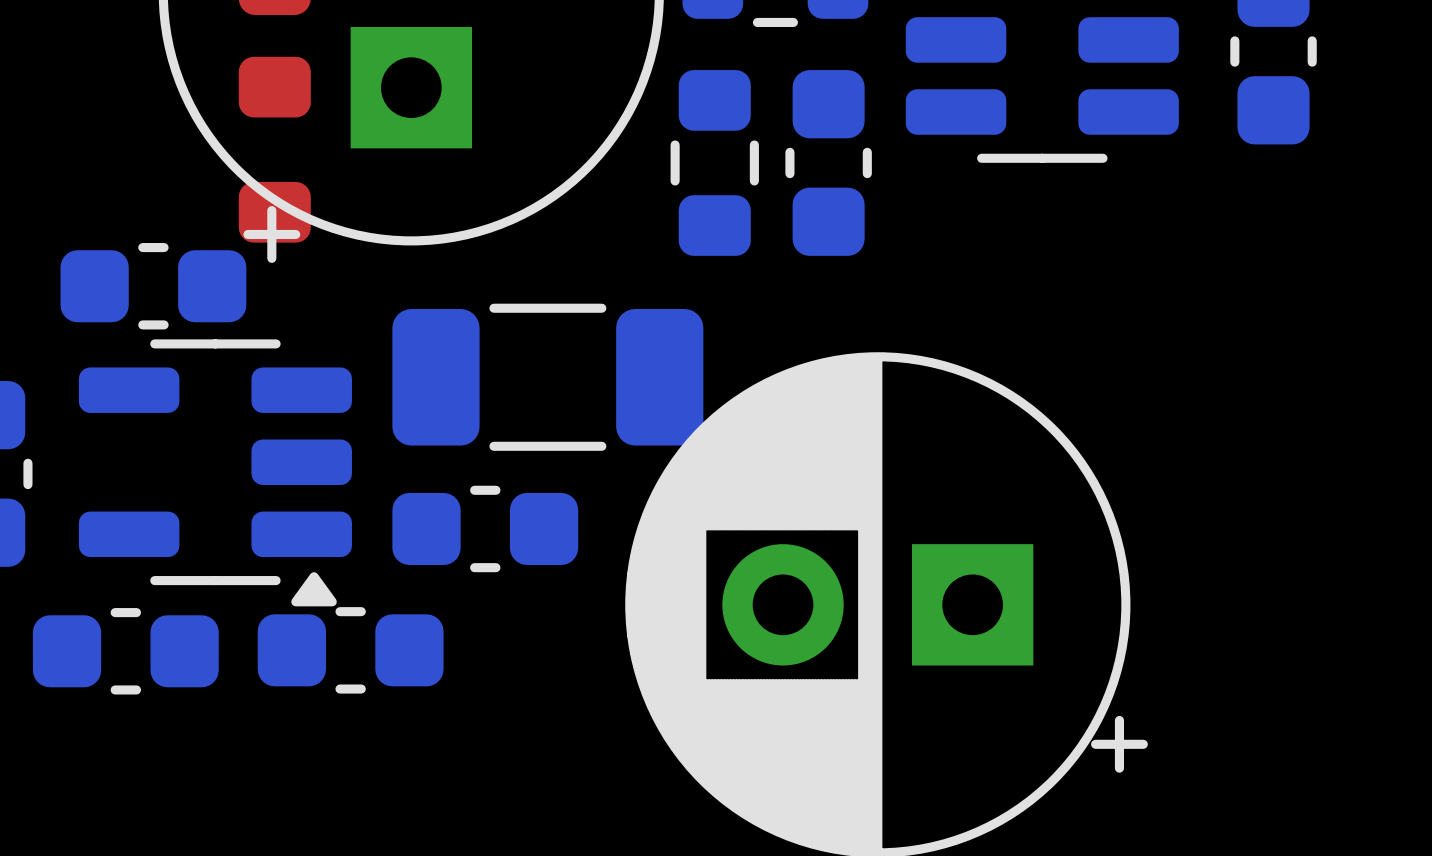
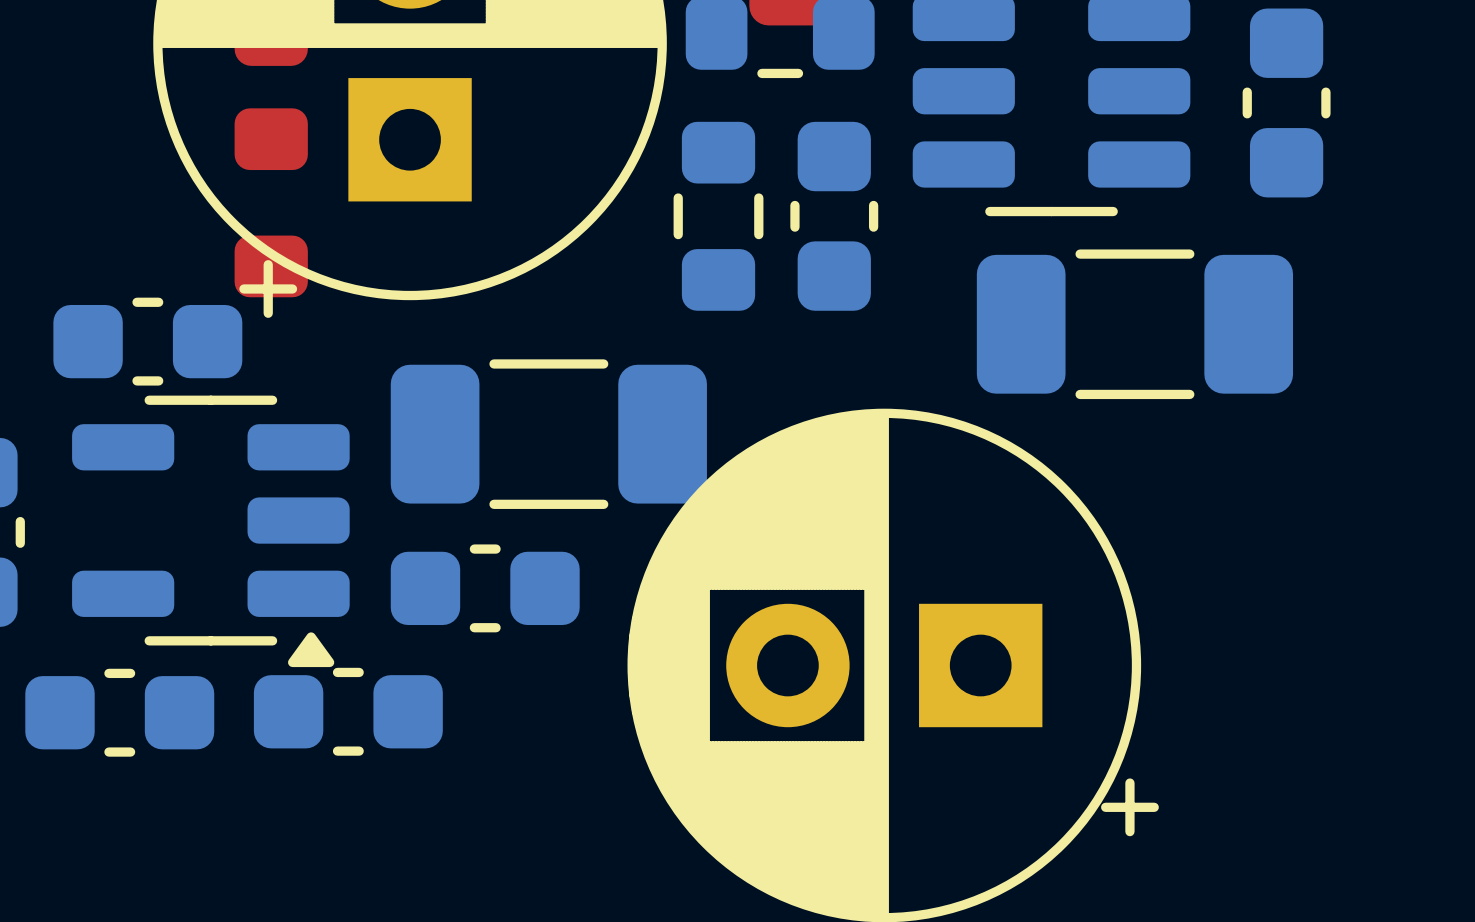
part: none -> (1134, 324)

